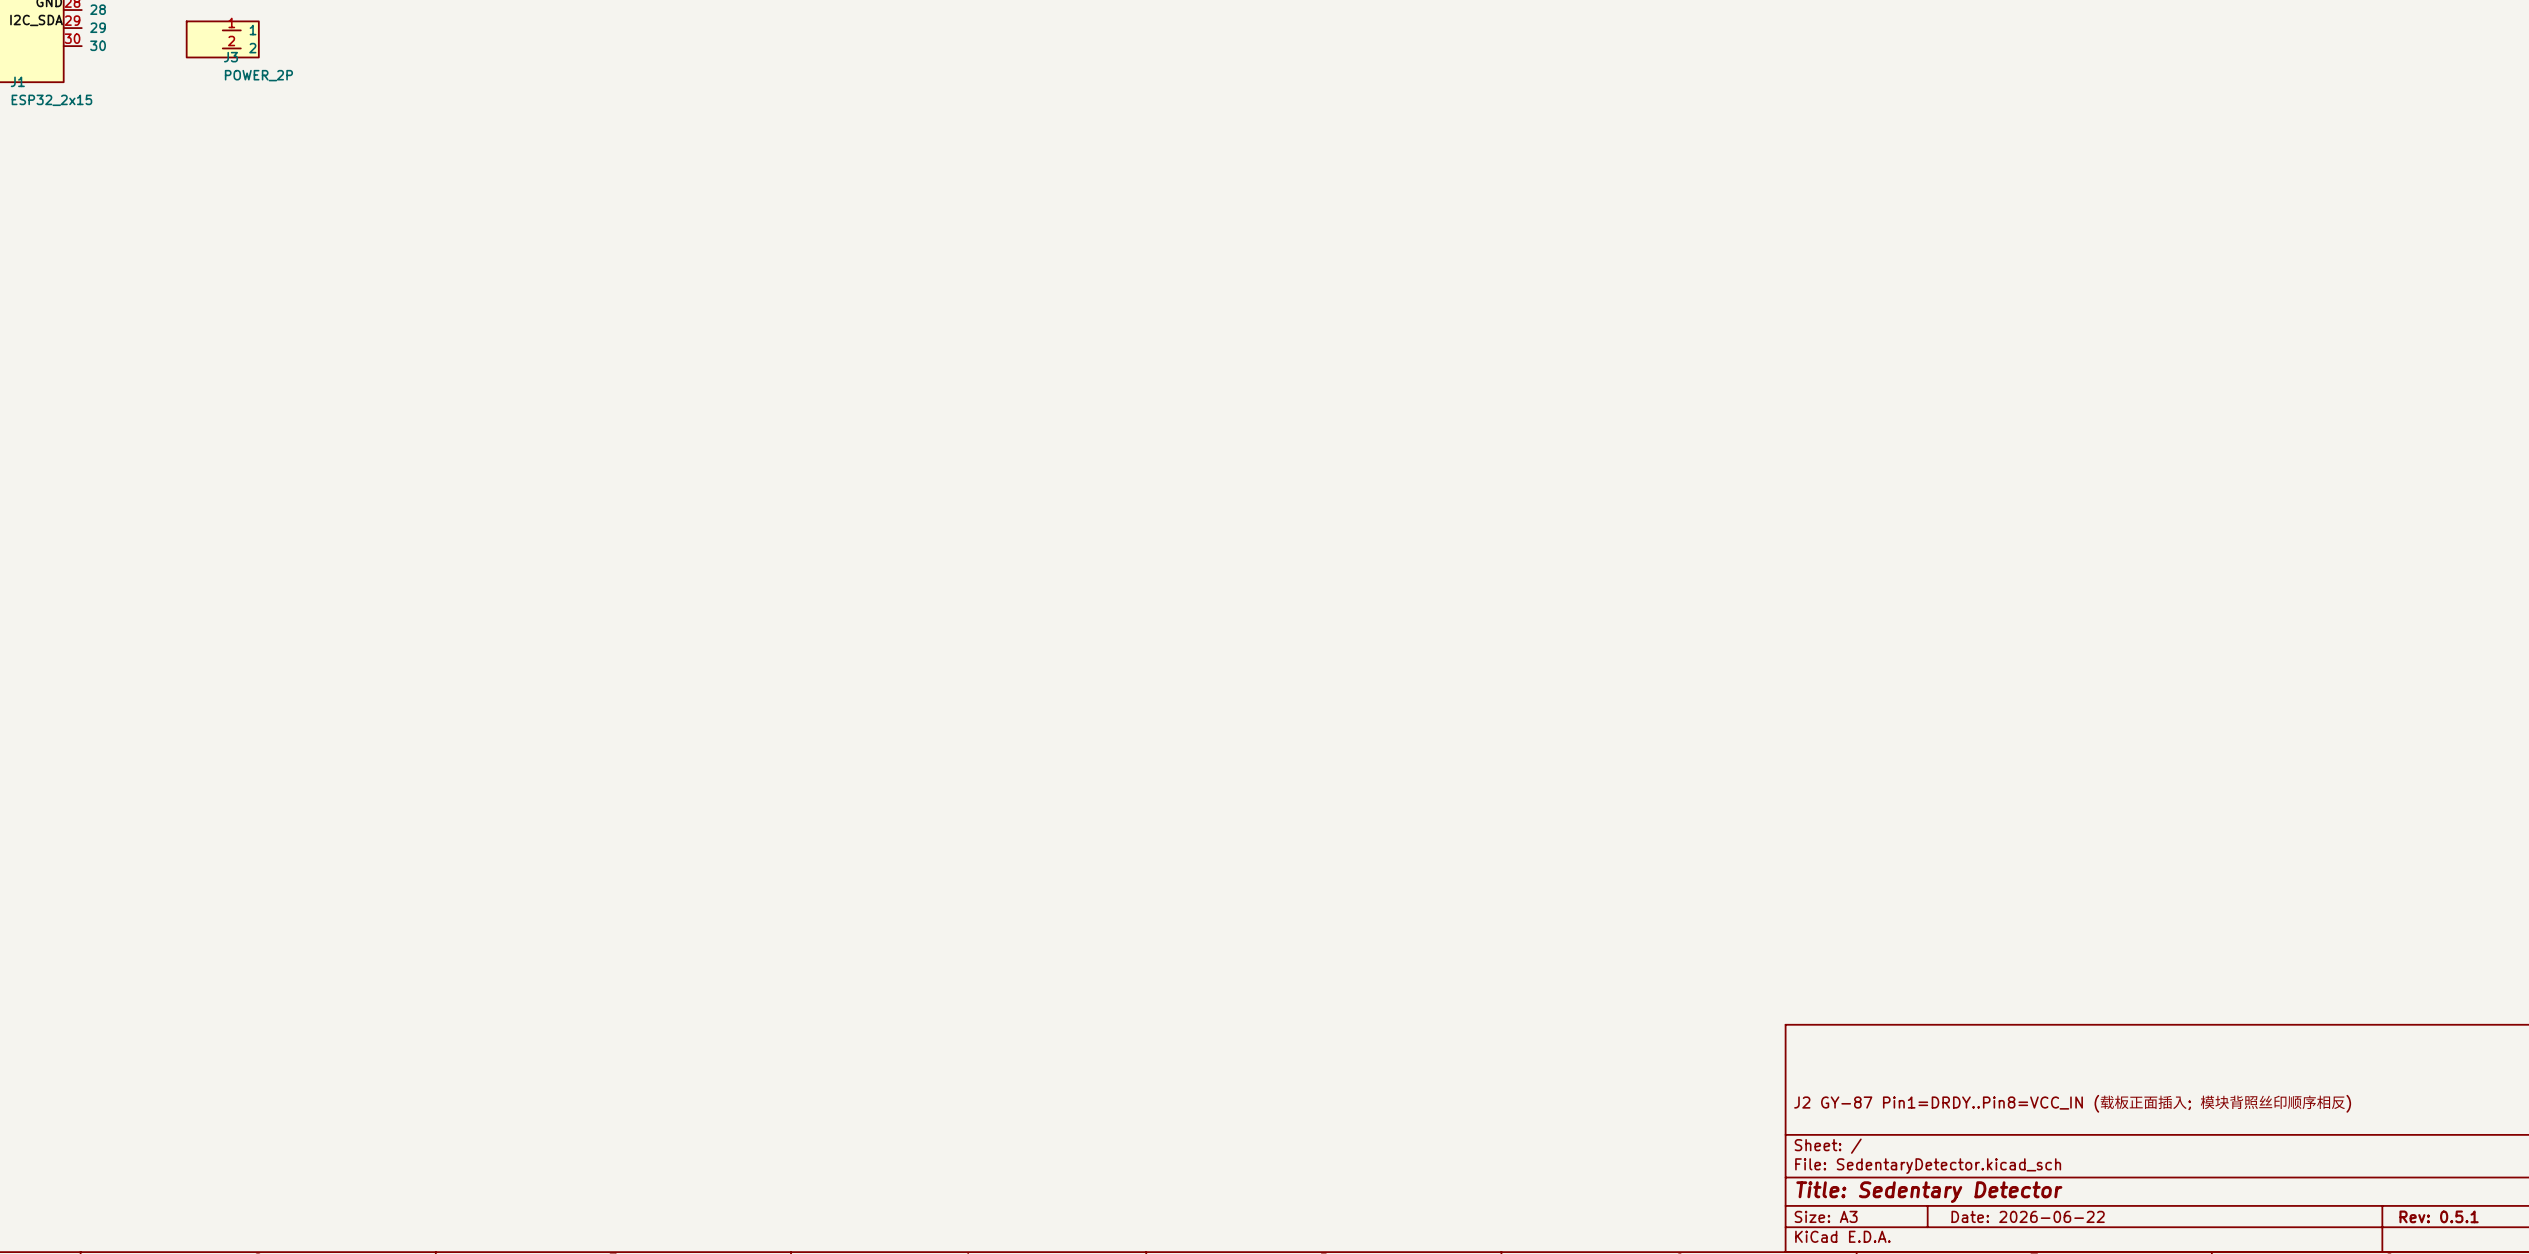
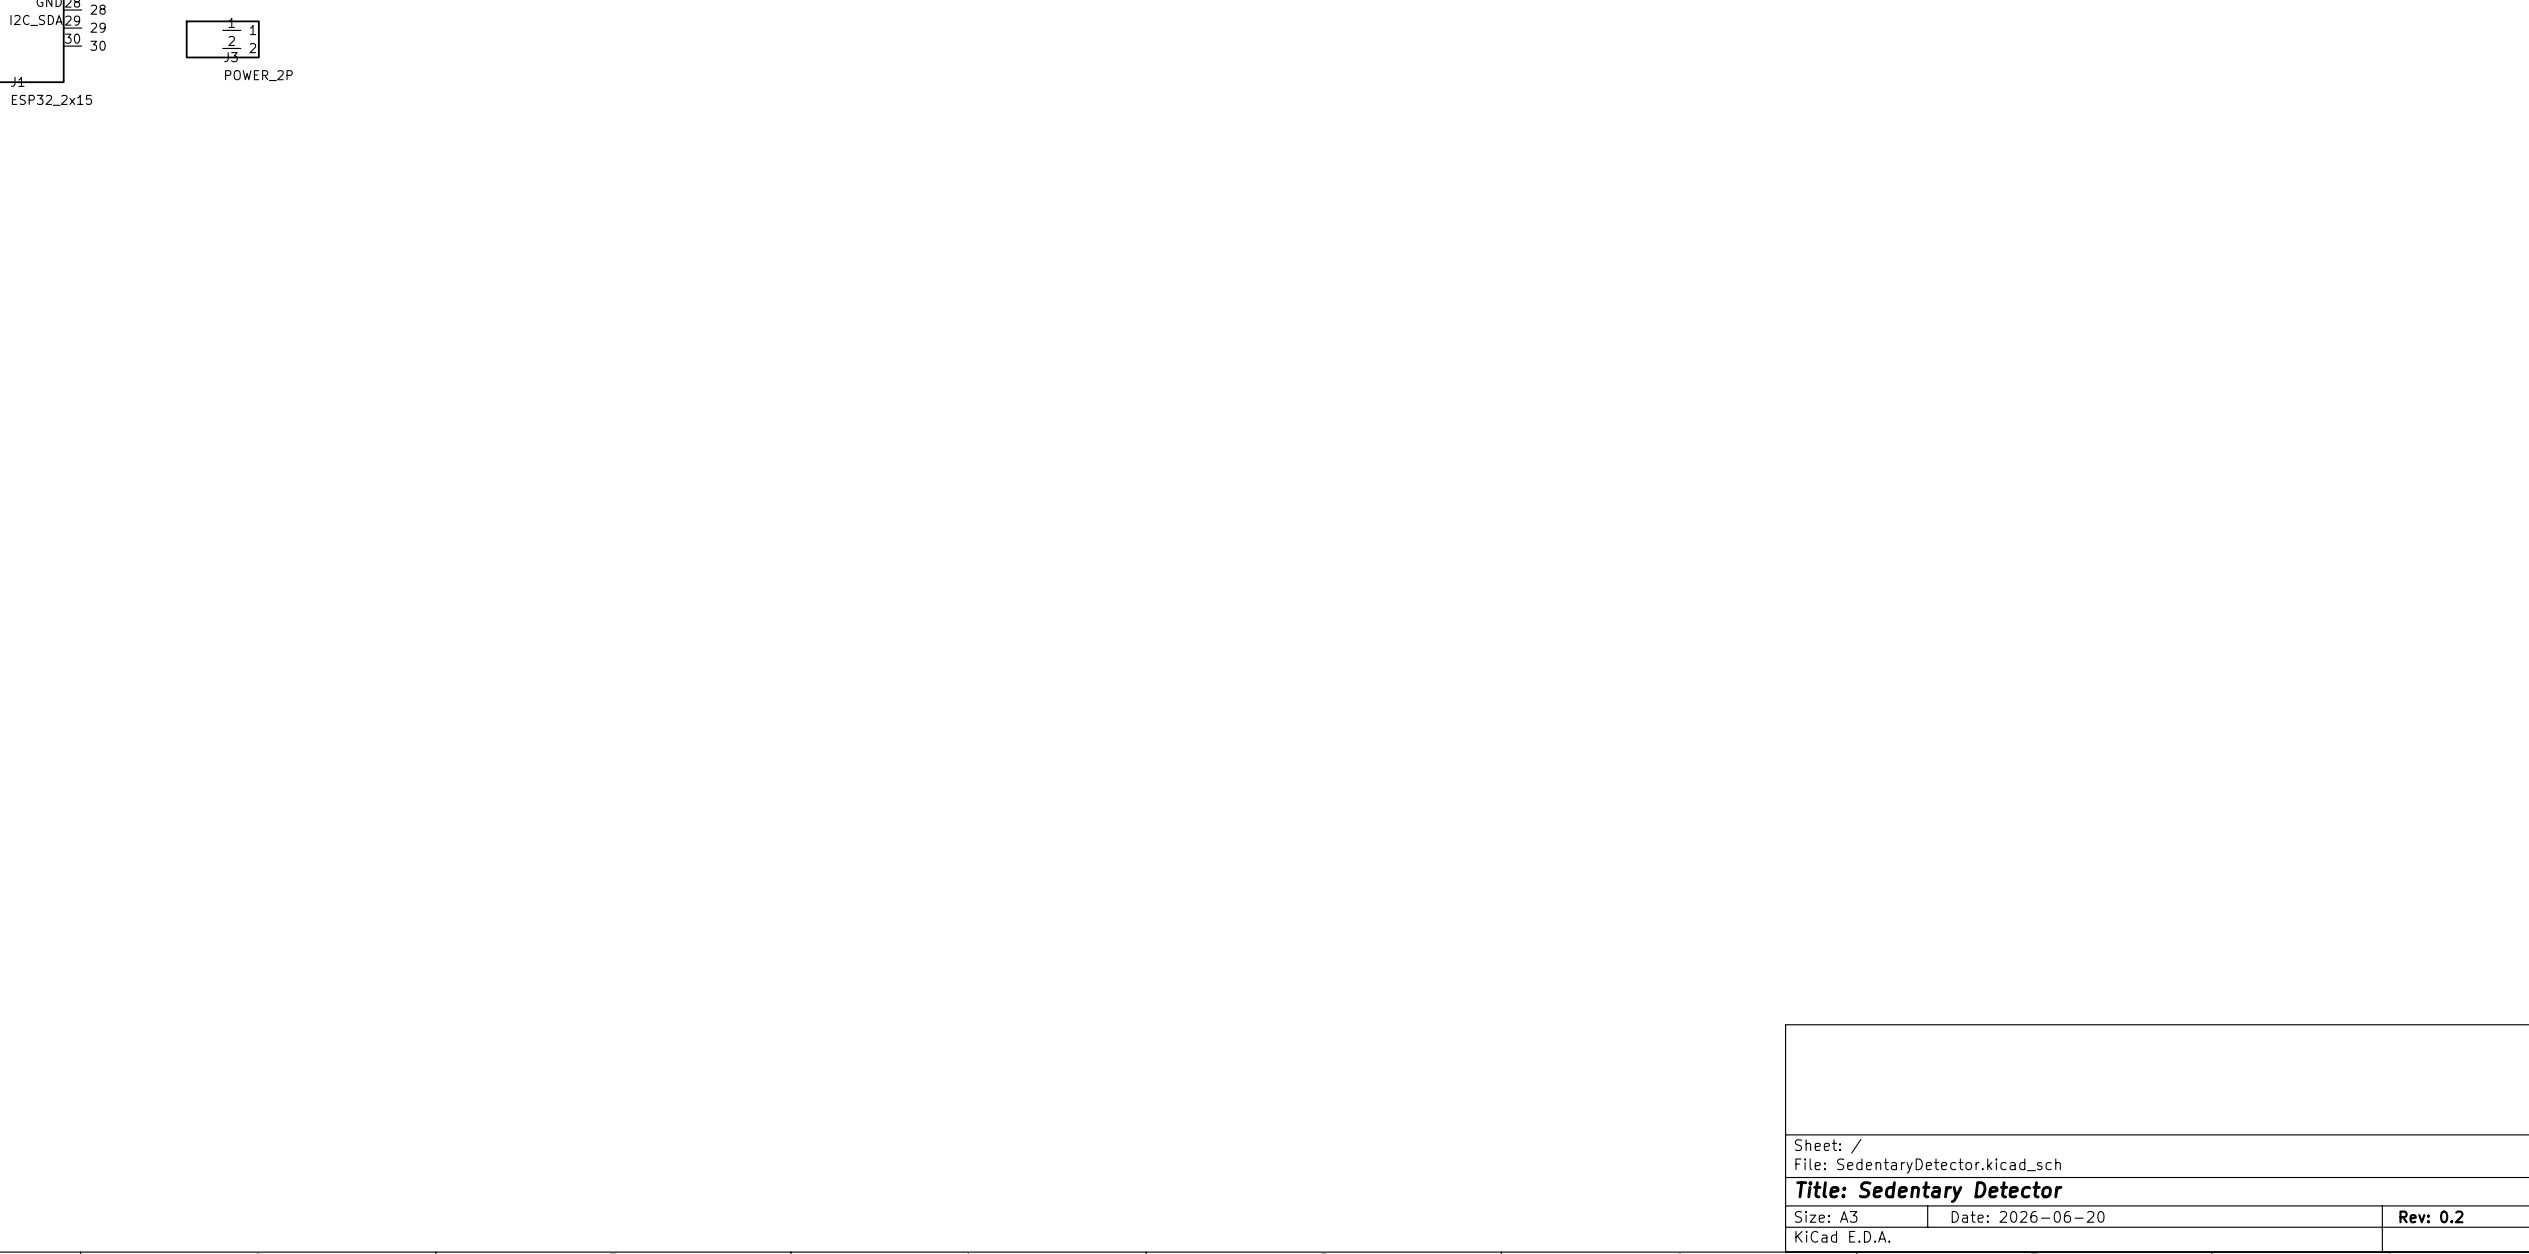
title block: J2 GY-87 Pin1=DRDY..Pin8=VCC_IN (载板正面插入; 模块背照丝印顺序相反) (2072, 1103) -> none
title block: Date: 2026-06-22 (2028, 1216) -> Date: 2026-06-20 (2028, 1216)
title block: Rev: 0.5.1 (2439, 1216) -> Rev: 0.2 (2431, 1216)

